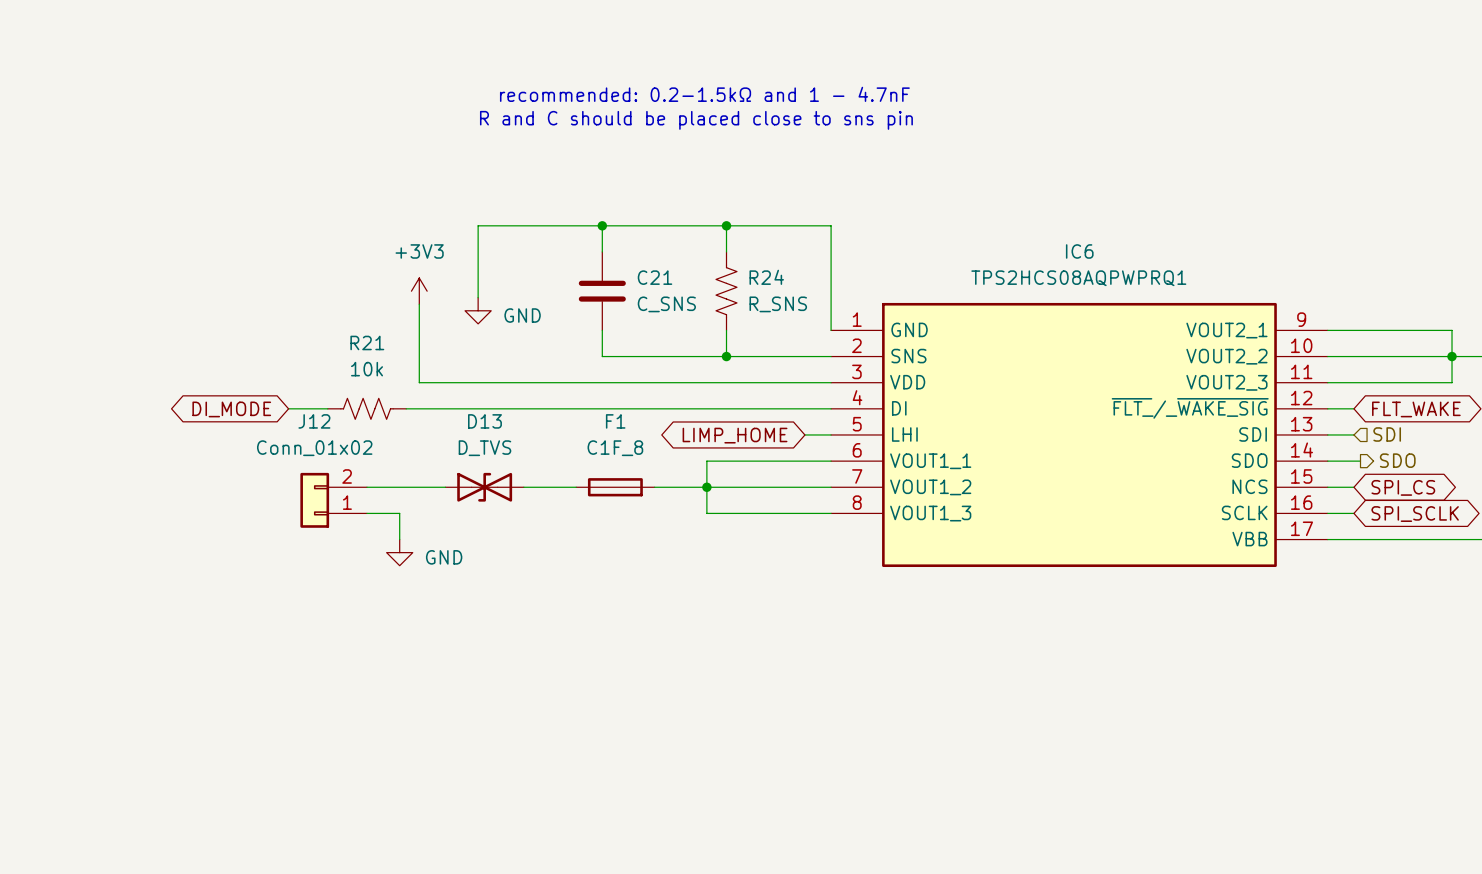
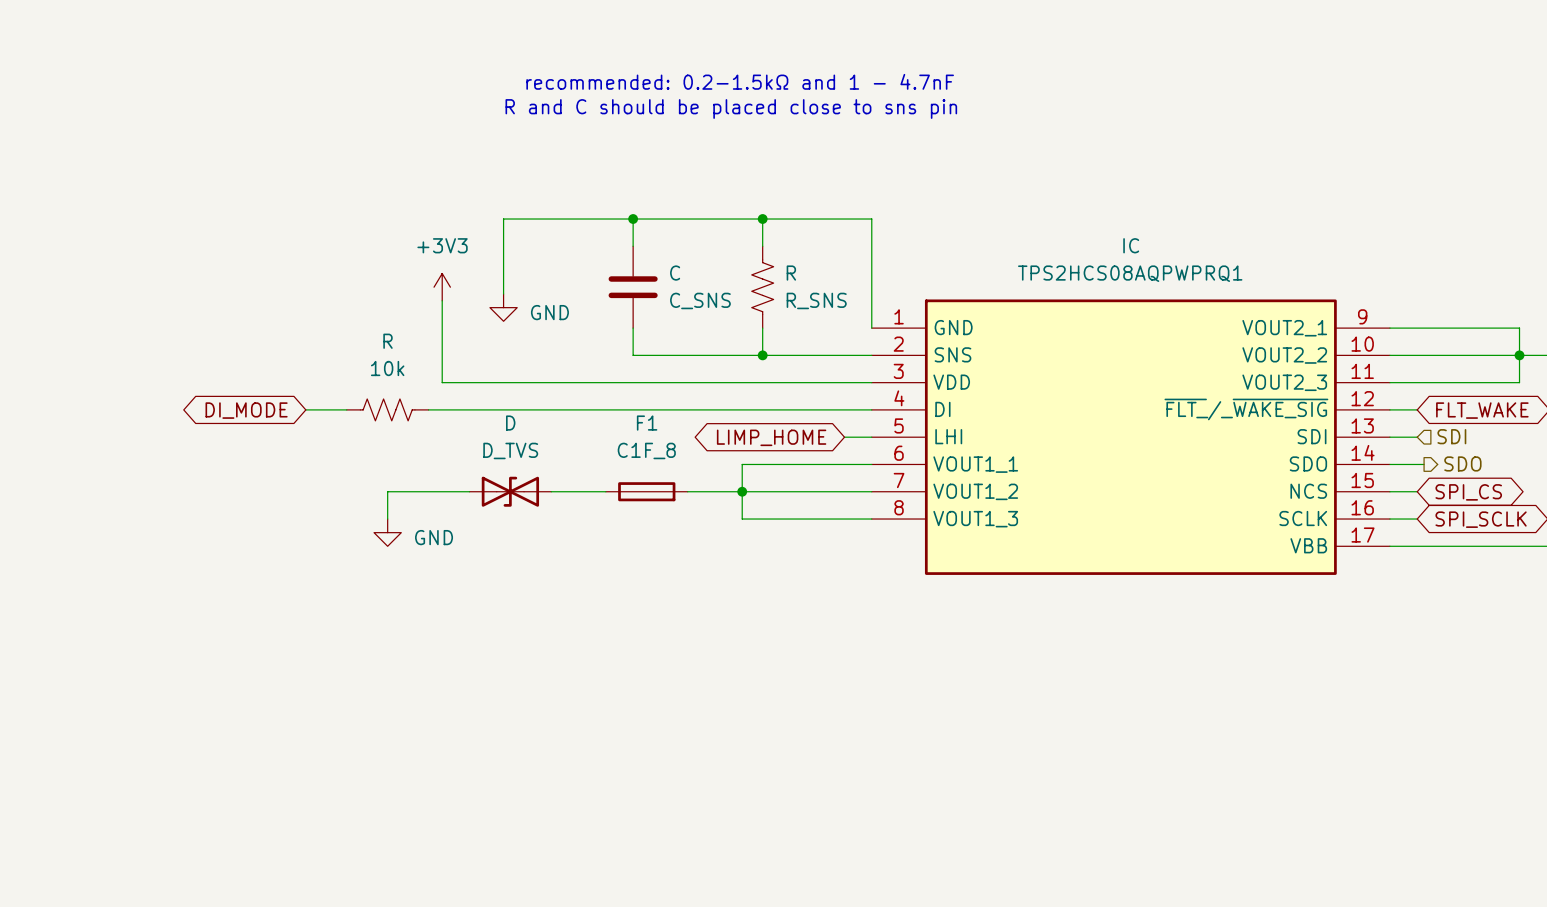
IC6 name: IC6 (1079, 251) -> IC (1131, 245)
C21 name: C21 (655, 277) -> C (675, 273)
R24 name: R24 (766, 277) -> R (791, 273)
R21 name: R21 (367, 342) -> R (387, 341)
D13 name: D13 (484, 421) -> D (510, 423)
J12: Conn_01x02 (333, 500) -> none
wire: (367, 513) (399, 513) (399, 539) -> (387, 519) (387, 491)
power symbol position: GND (399, 552) -> GND (387, 532)

